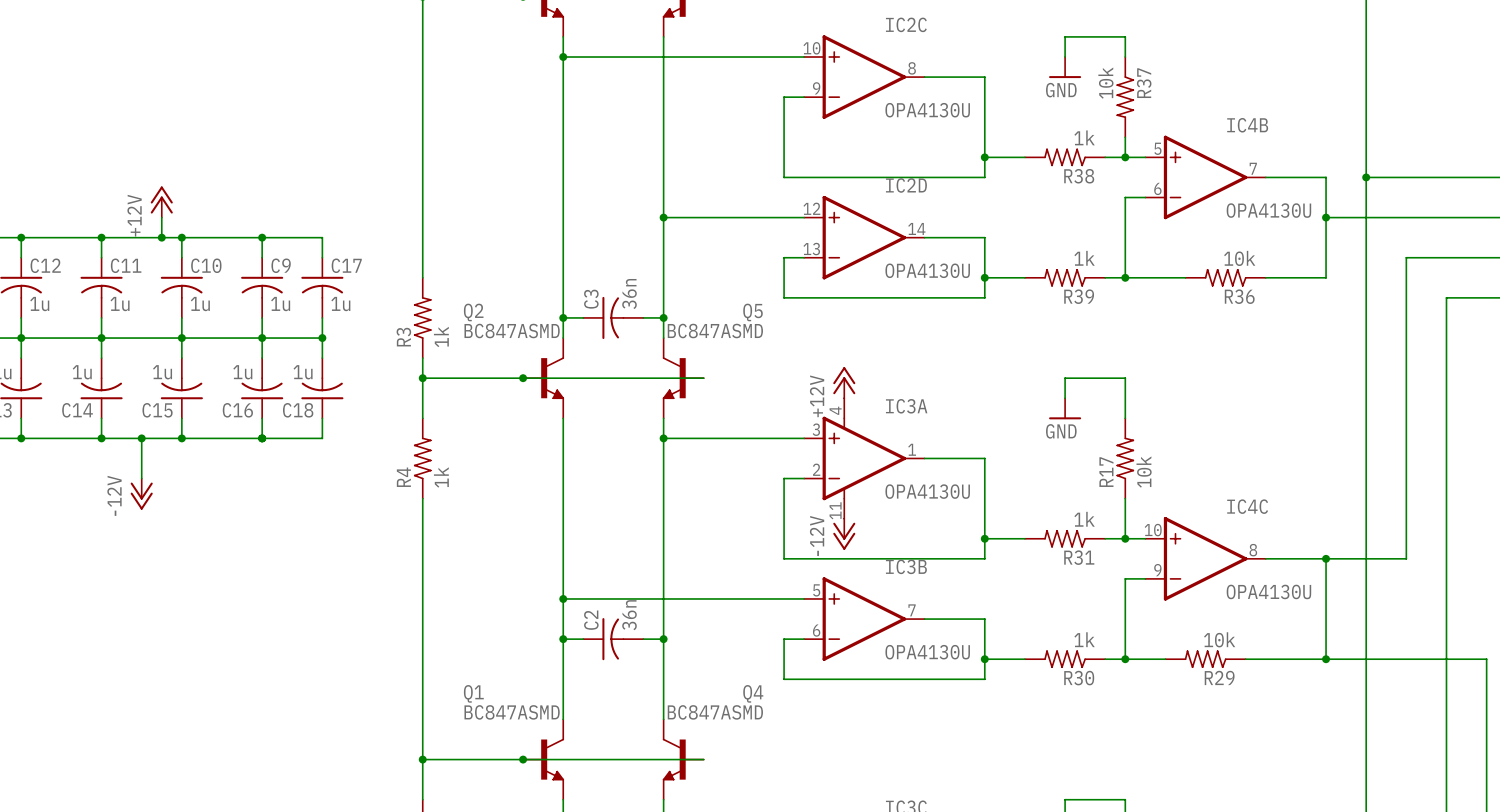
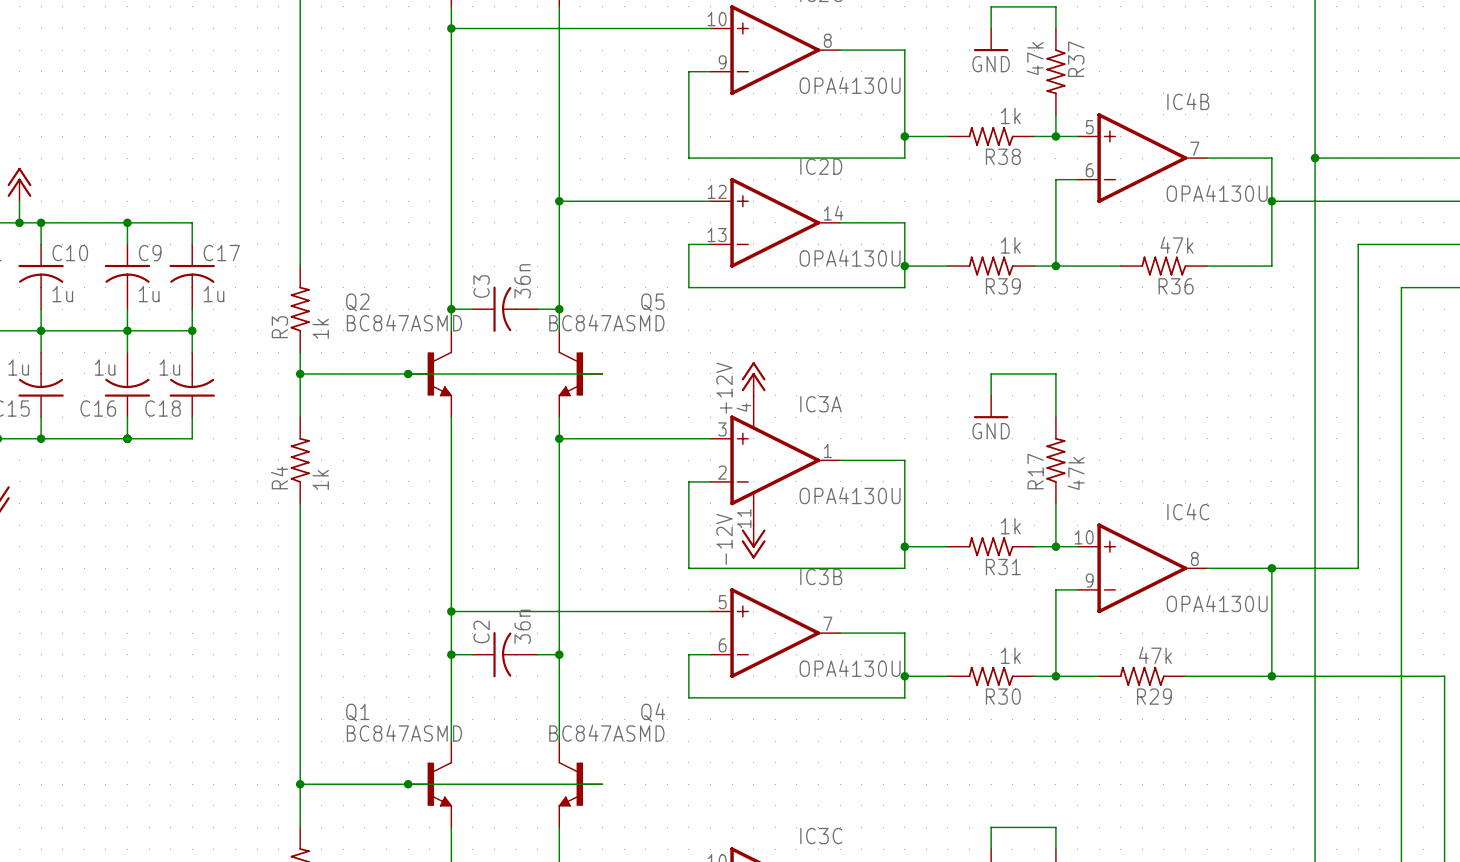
R37 value: 10k (1105, 83) -> 47k (1035, 58)
R36 value: 10k (1239, 258) -> 47k (1177, 245)
R17 value: 10k (1144, 472) -> 47k (1076, 473)
R29 value: 10k (1219, 639) -> 47k (1155, 655)

